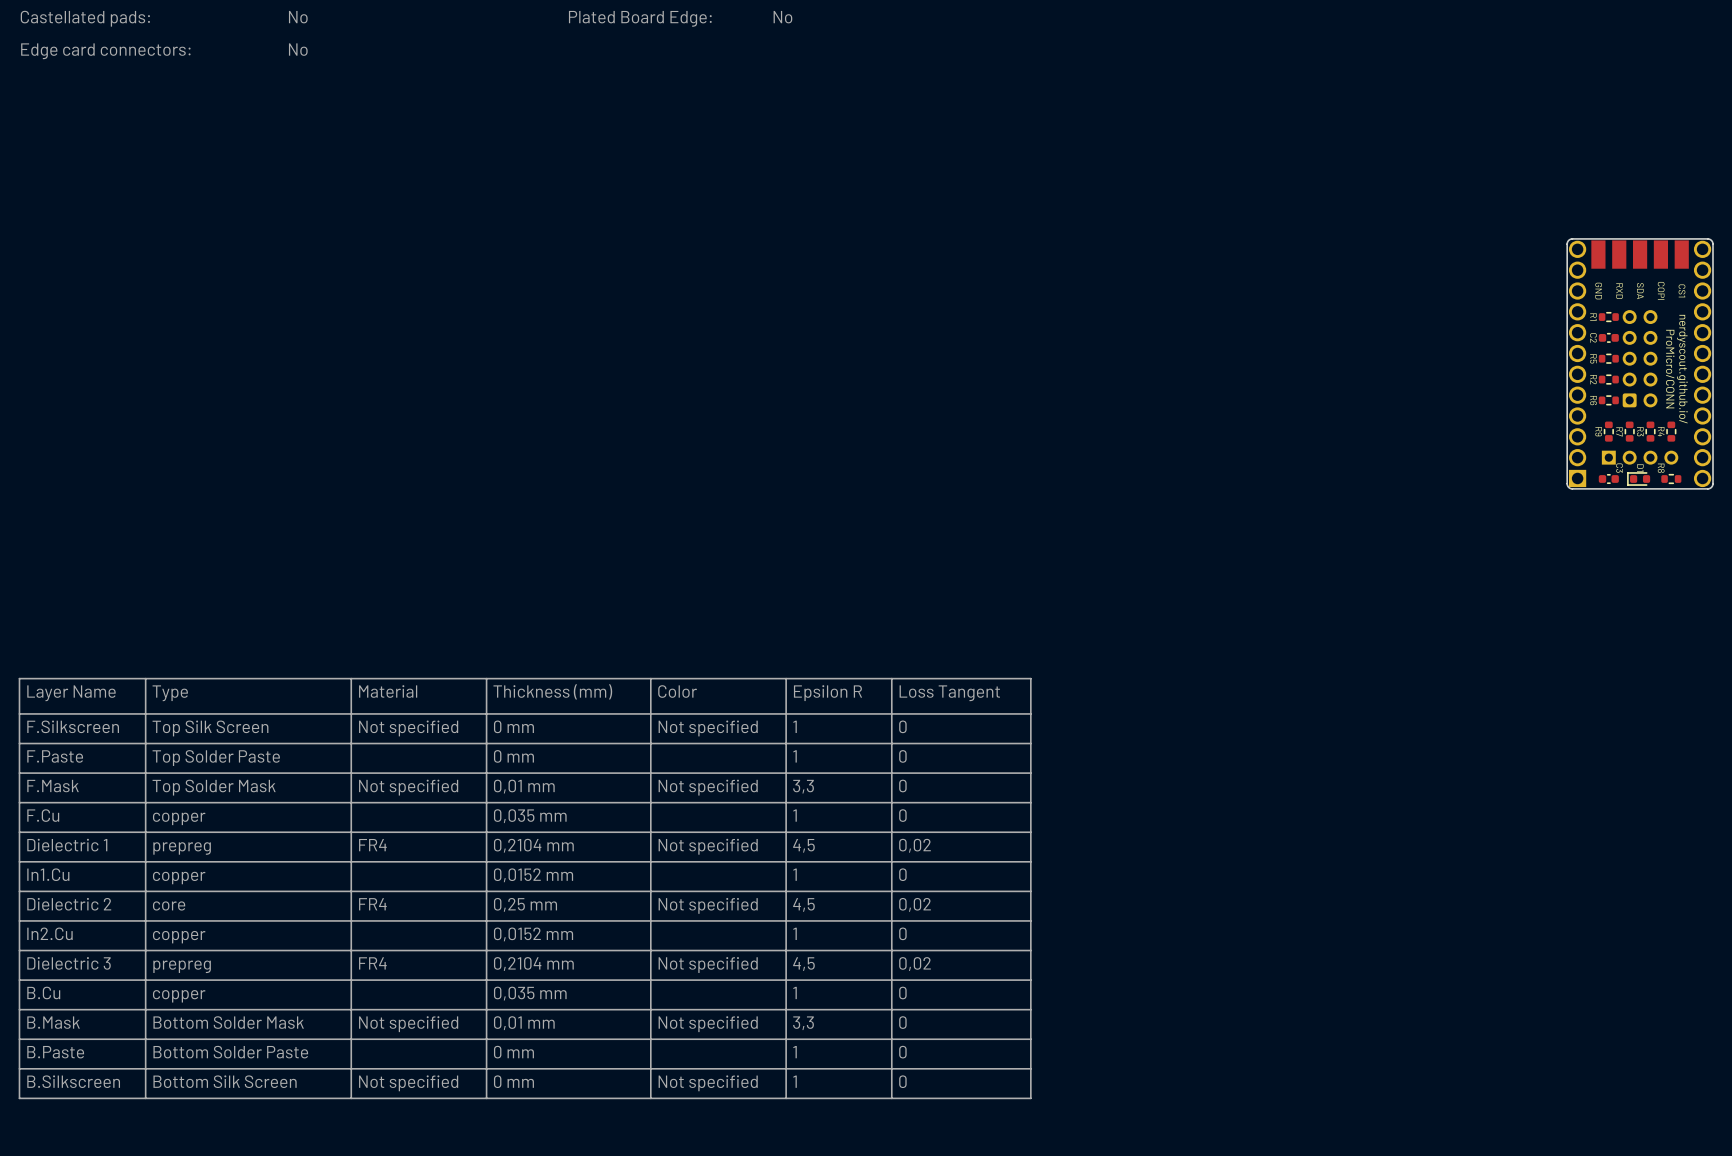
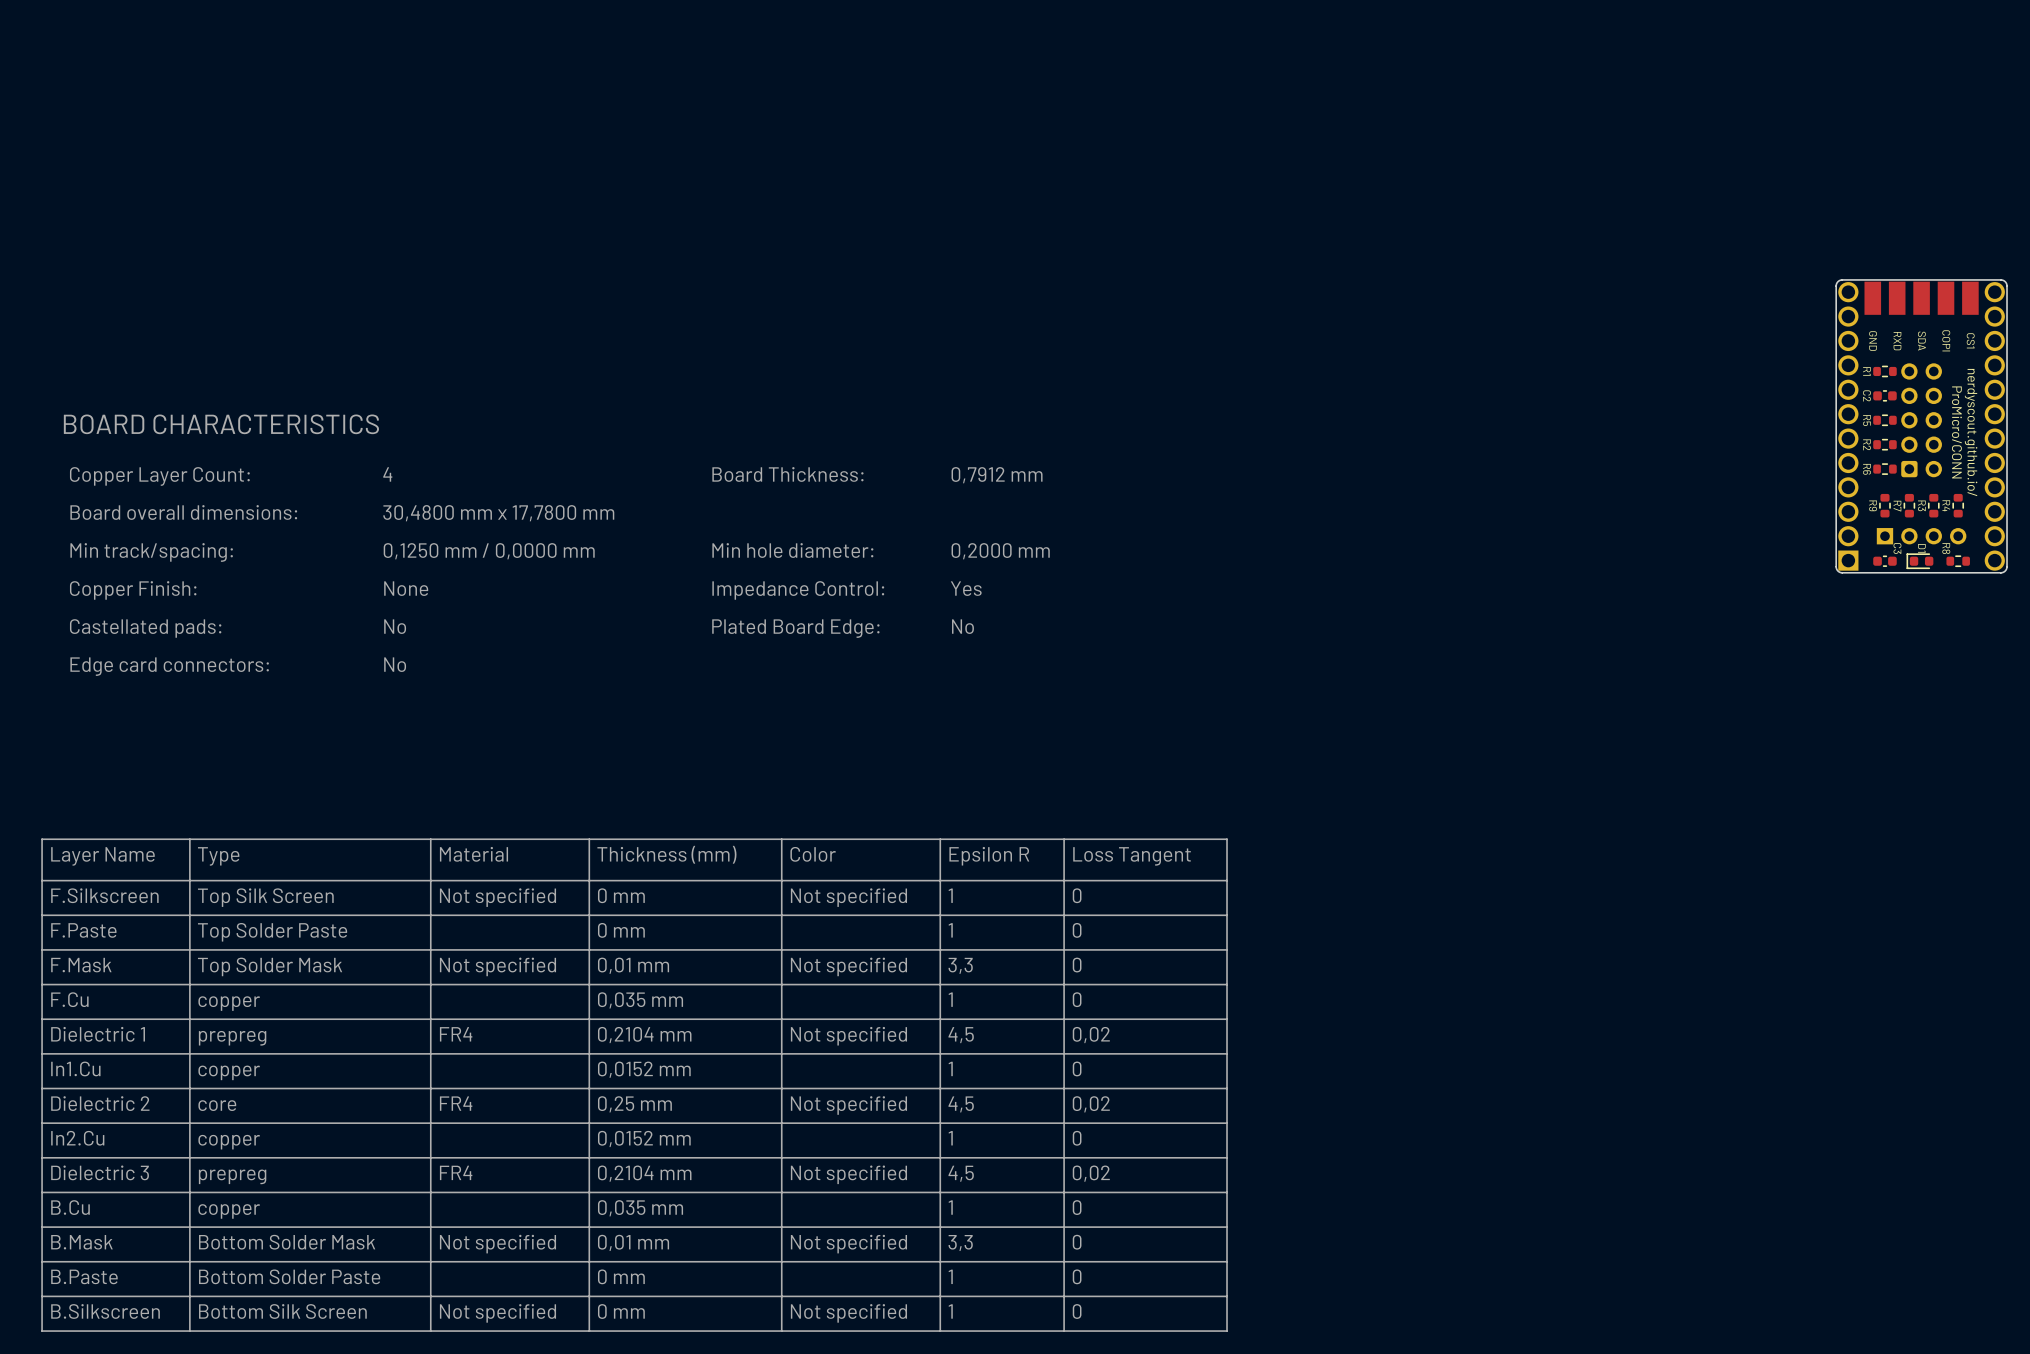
text: No (298, 17) -> none
text: No (782, 17) -> none
text: Castellated pads: (85, 18) -> none
text: Plated Board Edge: (640, 18) -> none
text: No (298, 49) -> none
text: Edge card connectors: (105, 51) -> none
text: none -> BOARD CHARACTERISTICS (221, 424)
text: none -> 4 (387, 474)
text: none -> Board Thickness: (787, 474)
text: none -> 0,7912 mm (997, 475)
text: none -> Copper Layer Count: (159, 476)
text: none -> Board overall dimensions: (183, 512)
text: none -> 30,4800 mm x 17,7800 mm (498, 513)
text: none -> Min hole diameter: (792, 550)
text: none -> 0,1250 mm / 0,0000 mm (489, 551)
text: none -> 0,2000 mm (1000, 551)
text: none -> Min track/spacing: (151, 552)
text: none -> None (406, 588)
text: none -> Yes (966, 588)
text: none -> Copper Finish: (133, 590)
text: none -> Impedance Control: (798, 590)
text: none -> No (395, 626)
text: none -> No (962, 626)
text: none -> Castellated pads: (145, 628)
text: none -> Plated Board Edge: (795, 628)
text: none -> No (395, 664)
text: none -> Edge card connectors: (169, 666)
line: (19, 678) (1030, 678) (1030, 1098) (19, 1098) (19, 678) -> (42, 839) (1227, 839) (1227, 1331) (42, 1331) (42, 839)
line: (145, 678) (145, 1098) -> (189, 839) (189, 1331)
line: (351, 678) (351, 1098) -> (430, 839) (430, 1331)
line: (486, 678) (486, 1098) -> (589, 839) (589, 1331)
line: (650, 678) (650, 1098) -> (781, 839) (781, 1331)
line: (786, 678) (786, 1098) -> (940, 839) (940, 1331)
line: (891, 678) (891, 1098) -> (1064, 839) (1064, 1331)
text position: Material (388, 691) -> Material (473, 854)
text position: Thickness (mm) (552, 691) -> Thickness (mm) (666, 854)
text position: Color (677, 691) -> Color (813, 854)
text position: Layer Name (71, 693) -> Layer Name (102, 856)
text position: Type (170, 693) -> Type (218, 856)
text position: Epsilon R (827, 693) -> Epsilon R (989, 856)
text position: Loss Tangent (949, 693) -> Loss Tangent (1132, 856)
line: (19, 713) (1030, 713) -> (42, 880) (1227, 880)
text position: F.Silkscreen (73, 726) -> F.Silkscreen (104, 895)
text: 0 mm (513, 726) -> none
text: 1 (795, 726) -> none
text: 0 (902, 726) -> none
text position: Top Silk Screen (210, 728) -> Top Silk Screen (265, 897)
text: Not specified (408, 728) -> none
text: Not specified (708, 728) -> none
line: (19, 743) (1030, 743) -> (42, 915) (1227, 915)
text position: F.Paste (55, 756) -> F.Paste (83, 930)
text position: 0 mm (513, 756) -> 0 mm (621, 895)
text position: 1 (795, 756) -> 1 (950, 895)
text: 0 (902, 756) -> none
text position: Top Solder Paste (216, 758) -> Top Solder Paste (272, 932)
text: none -> 0 (1077, 895)
line: (19, 773) (1030, 773) -> (42, 949) (1227, 949)
text: 0 (902, 785) -> none
text position: F.Mask (53, 786) -> F.Mask (81, 965)
text position: 0,01 mm (524, 786) -> 0,01 mm (633, 965)
text position: 3,3 (803, 786) -> 3,3 (960, 965)
text position: Top Solder Mask (214, 787) -> Top Solder Mask (270, 966)
text position: Not specified (408, 787) -> Not specified (497, 897)
text position: Not specified (708, 787) -> Not specified (848, 897)
text: none -> 0 mm (621, 930)
text: none -> 0 (1077, 930)
line: (19, 802) (1030, 802) -> (42, 984) (1227, 984)
text position: F.Cu (43, 815) -> F.Cu (69, 999)
text position: 1 (795, 815) -> 1 (950, 930)
text: 0 (902, 815) -> none
text position: 0,035 mm (530, 816) -> 0,035 mm (640, 1000)
text: copper (179, 818) -> none
text: none -> 0 (1077, 965)
text: none -> Not specified (497, 966)
line: (19, 832) (1030, 832) -> (42, 1019) (1227, 1019)
text position: Dielectric 1 (67, 845) -> Dielectric 1 (98, 1034)
text: FR4 (372, 845) -> none
text: 0,2104 mm (533, 845) -> none
text: 4,5 (803, 845) -> none
text: 0,02 (915, 845) -> none
text position: Not specified (708, 846) -> Not specified (848, 966)
text: prepreg (182, 848) -> none
line: (19, 861) (1030, 861) -> (42, 1053) (1227, 1053)
text position: In1.Cu (48, 874) -> In1.Cu (75, 1068)
text position: 1 (795, 874) -> 1 (950, 999)
text position: 0 (902, 874) -> 0 (1077, 999)
text: 0,0152 mm (533, 875) -> 0,2104 mm (644, 1035)
text position: copper (179, 878) -> copper (229, 1003)
text: none -> prepreg (232, 1038)
line: (19, 891) (1030, 891) -> (42, 1088) (1227, 1088)
text position: Dielectric 2 (69, 904) -> Dielectric 2 (100, 1103)
text position: FR4 (372, 904) -> FR4 (456, 1034)
text position: 0,25 mm (525, 904) -> 0,25 mm (634, 1104)
text position: 4,5 (803, 904) -> 4,5 (961, 1035)
text position: 0,02 (915, 904) -> 0,02 (1091, 1035)
text position: core (169, 905) -> core (217, 1105)
text position: Not specified (708, 905) -> Not specified (848, 1036)
line: (19, 920) (1030, 920) -> (42, 1123) (1227, 1123)
text position: In2.Cu (49, 933) -> In2.Cu (77, 1138)
text position: 1 (795, 933) -> 1 (950, 1068)
text position: 0 (902, 933) -> 0 (1077, 1068)
text position: 0,0152 mm (533, 934) -> 0,0152 mm (644, 1069)
text position: copper (179, 937) -> copper (229, 1072)
line: (19, 950) (1030, 950) -> (42, 1157) (1227, 1157)
text position: Dielectric 3 (69, 963) -> Dielectric 3 (100, 1172)
text position: FR4 (372, 963) -> FR4 (456, 1103)
text: 0,2104 mm (533, 964) -> 0,0152 mm (644, 1138)
text position: 4,5 (803, 964) -> 4,5 (961, 1104)
text position: 0,02 (915, 964) -> 0,02 (1091, 1104)
text position: Not specified (708, 965) -> Not specified (848, 1105)
text: prepreg (182, 966) -> none
line: (19, 980) (1030, 980) -> (42, 1192) (1227, 1192)
text position: B.Cu (43, 992) -> B.Cu (70, 1207)
text position: 1 (795, 992) -> 1 (950, 1138)
text position: 0 (902, 992) -> 0 (1077, 1138)
text position: 0,035 mm (530, 993) -> 0,035 mm (640, 1208)
text position: copper (179, 996) -> copper (229, 1142)
text: none -> FR4 (456, 1172)
text: none -> 0,2104 mm (644, 1173)
text: none -> 4,5 (961, 1173)
text: none -> 0,02 (1091, 1173)
text: none -> prepreg (232, 1176)
line: (19, 1009) (1030, 1009) -> (42, 1227) (1227, 1227)
text position: B.Mask (53, 1022) -> B.Mask (81, 1242)
text position: Bottom Solder Mask (228, 1022) -> Bottom Solder Mask (287, 1242)
text: 0 (902, 1022) -> none
text position: 0,01 mm (524, 1023) -> 0,01 mm (633, 1242)
text position: 3,3 (803, 1023) -> 3,3 (960, 1243)
text: Not specified (408, 1024) -> none
text position: Not specified (708, 1024) -> Not specified (848, 1174)
text: none -> 0 (1077, 1207)
text: none -> copper (229, 1211)
line: (19, 1039) (1030, 1039) -> (42, 1261) (1227, 1261)
text position: B.Paste (55, 1052) -> B.Paste (84, 1276)
text position: Bottom Solder Paste (230, 1052) -> Bottom Solder Paste (289, 1276)
text: 0 mm (513, 1052) -> none
text position: 1 (795, 1052) -> 1 (950, 1207)
text: 0 (902, 1052) -> none
text: none -> 0 (1077, 1242)
line: (19, 1068) (1030, 1068) -> (42, 1296) (1227, 1296)
text position: B.Silkscreen (73, 1081) -> B.Silkscreen (105, 1311)
text position: Bottom Silk Screen (225, 1081) -> Bottom Silk Screen (282, 1311)
text position: 0 mm (513, 1081) -> 0 mm (621, 1276)
text position: 1 (795, 1081) -> 1 (950, 1276)
text: 0 (902, 1081) -> none
text position: Not specified (408, 1083) -> Not specified (497, 1244)
text position: Not specified (708, 1083) -> Not specified (848, 1244)
text: none -> 0 (1077, 1276)
text: none -> 0 mm (621, 1311)
text: none -> 1 (950, 1311)
text: none -> 0 (1077, 1311)
text: none -> Not specified (497, 1313)
text: none -> Not specified (848, 1313)

